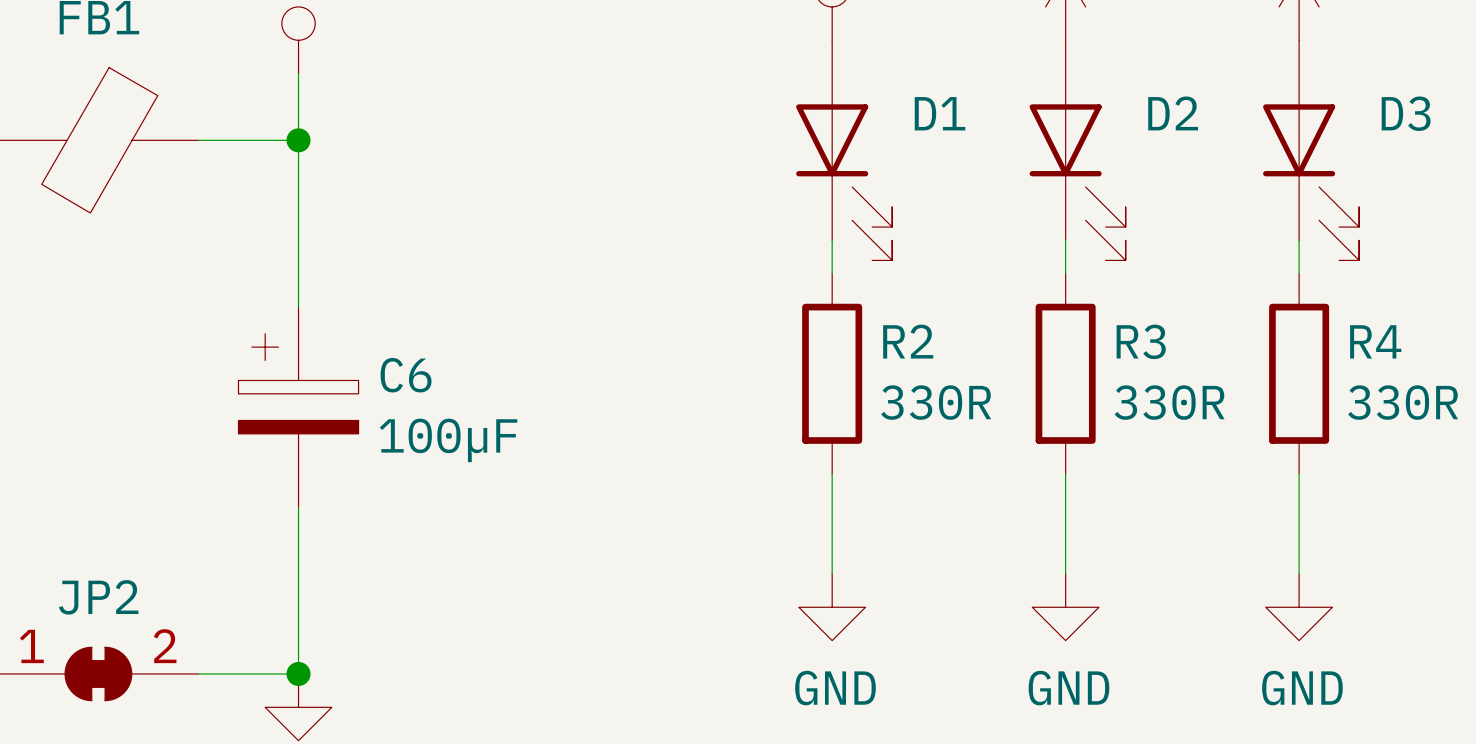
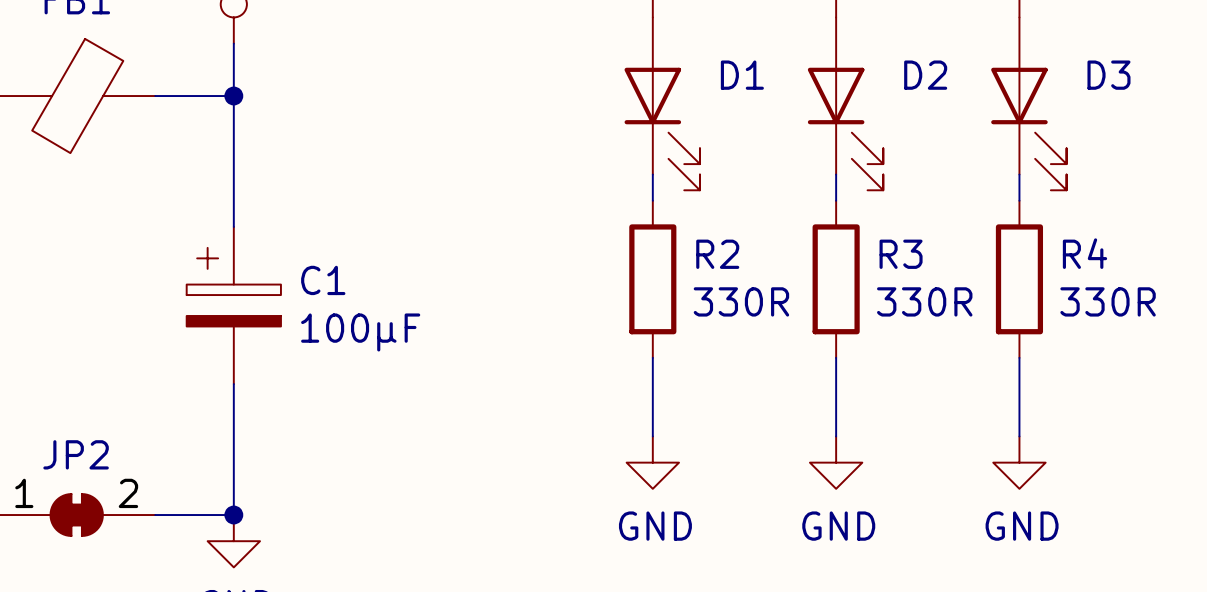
C6 name: C6 (406, 375) -> C1 (323, 280)

